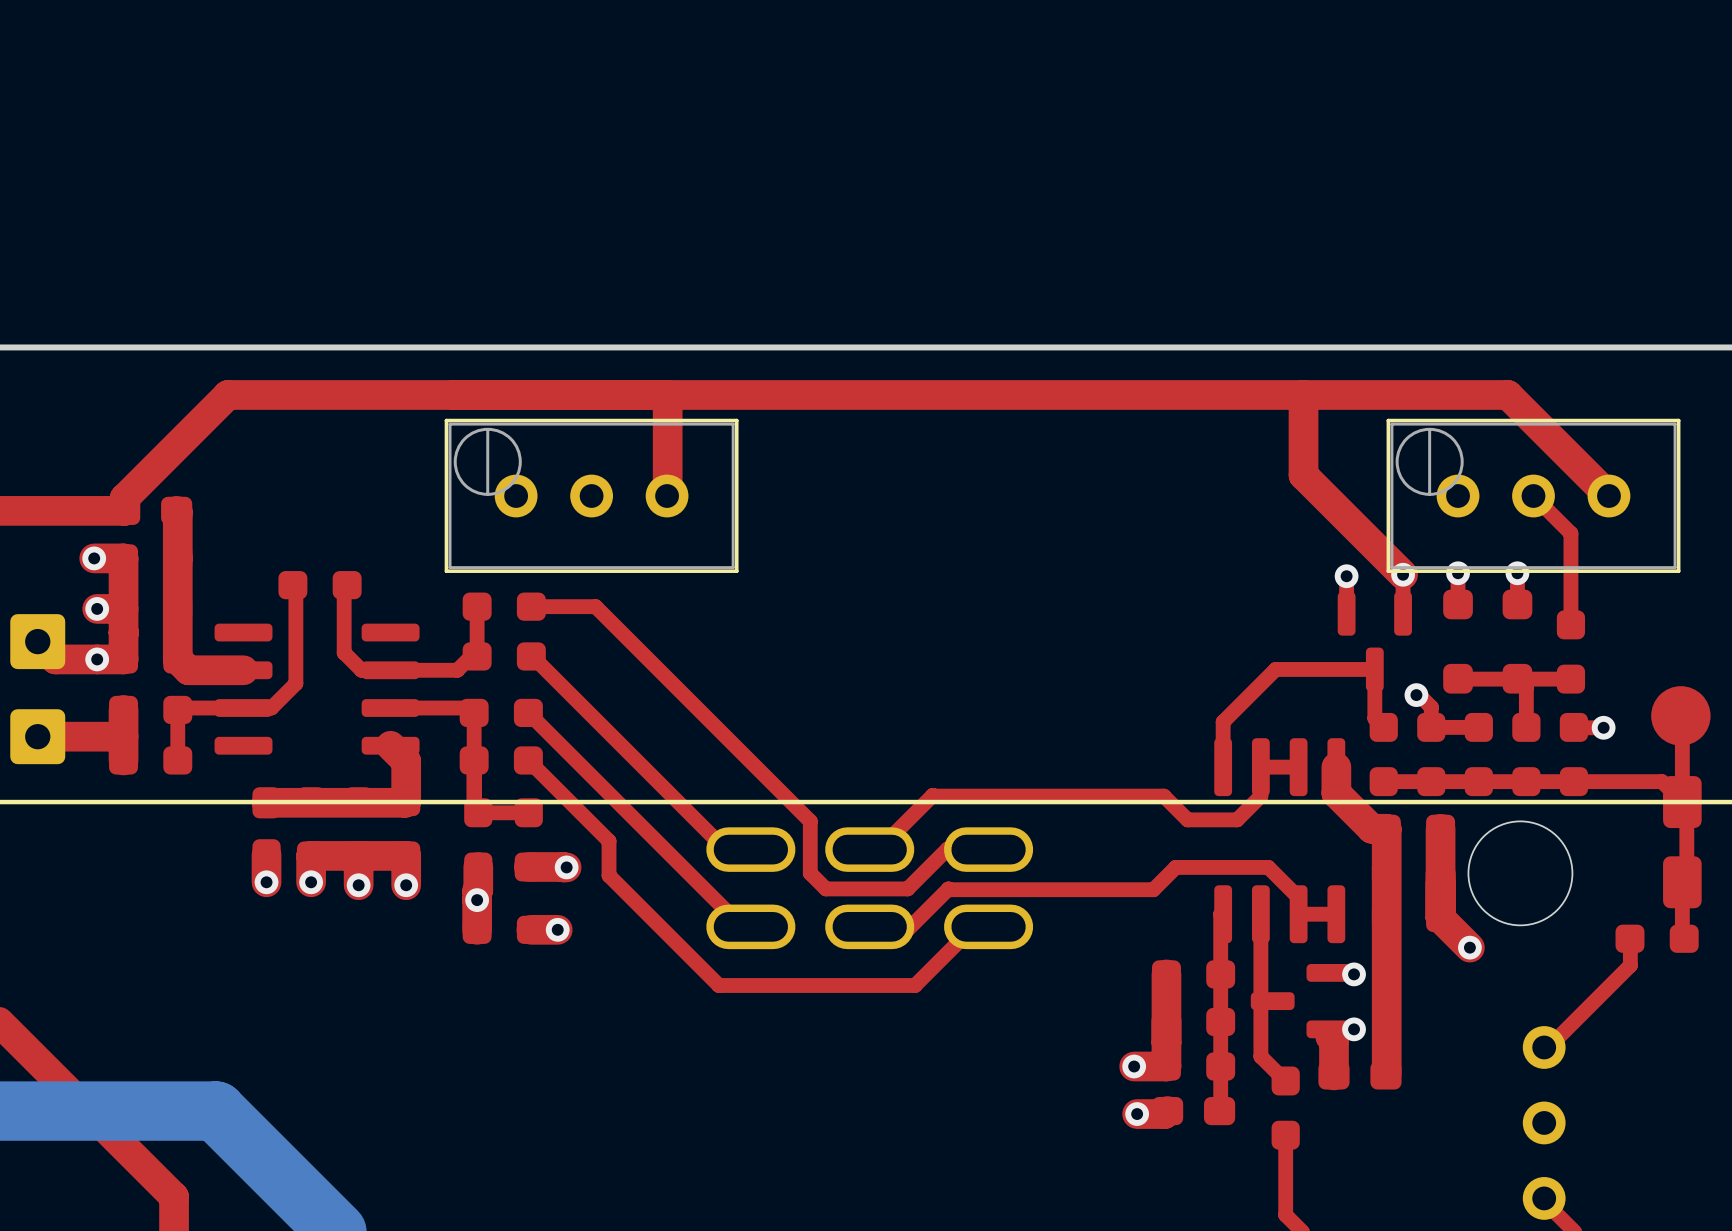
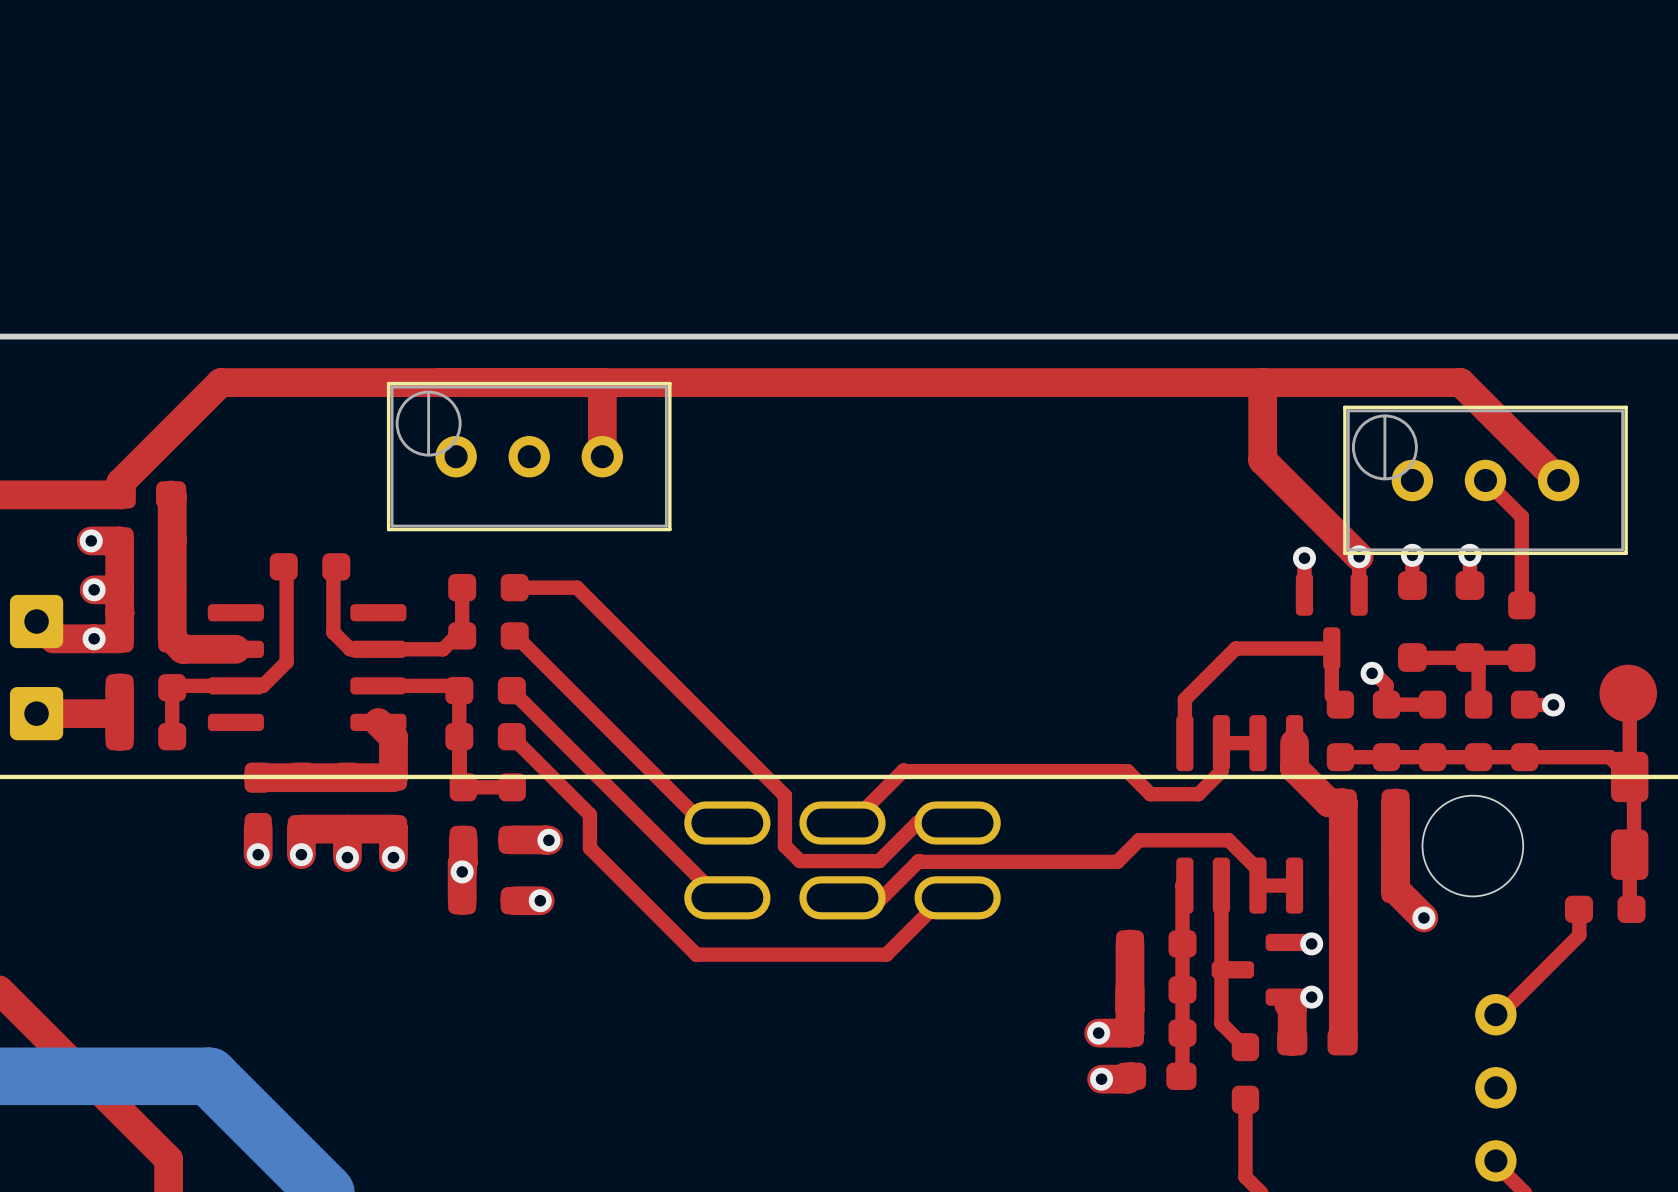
top track: none -> (602, 382) (602, 456)
top track: (667, 394) (667, 496) -> none
part position: (591, 495) -> (529, 456)

